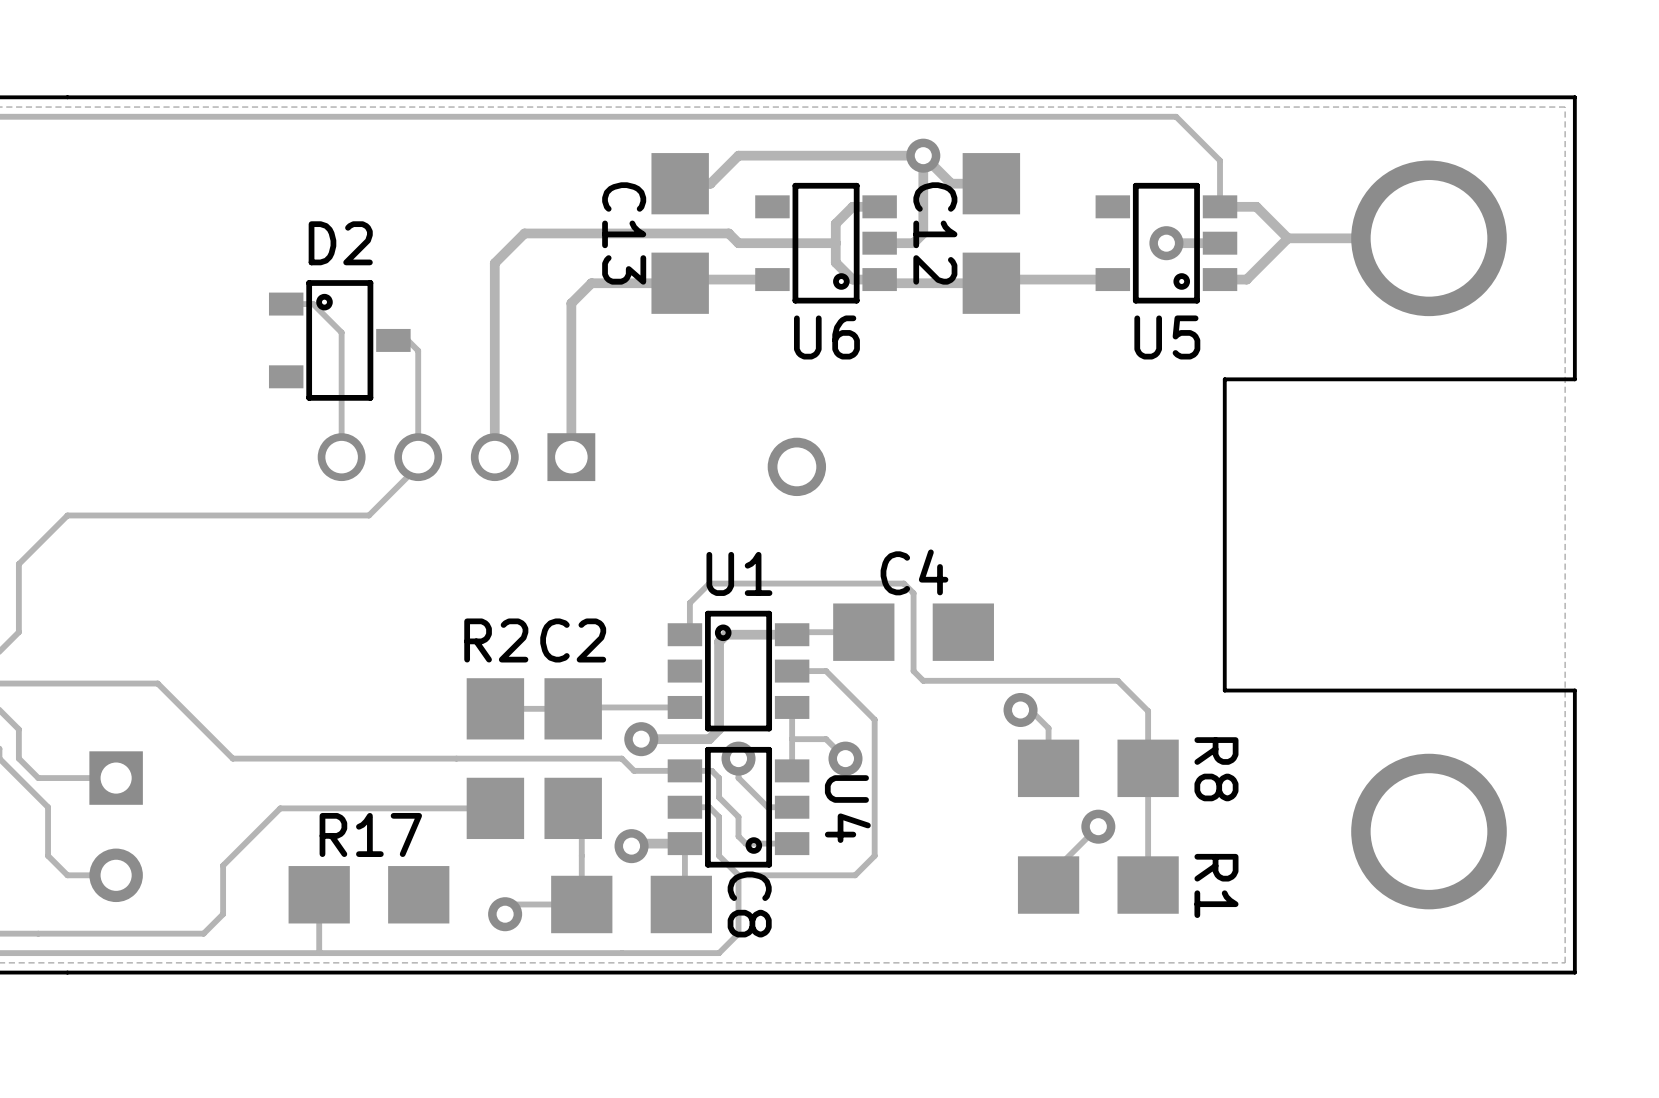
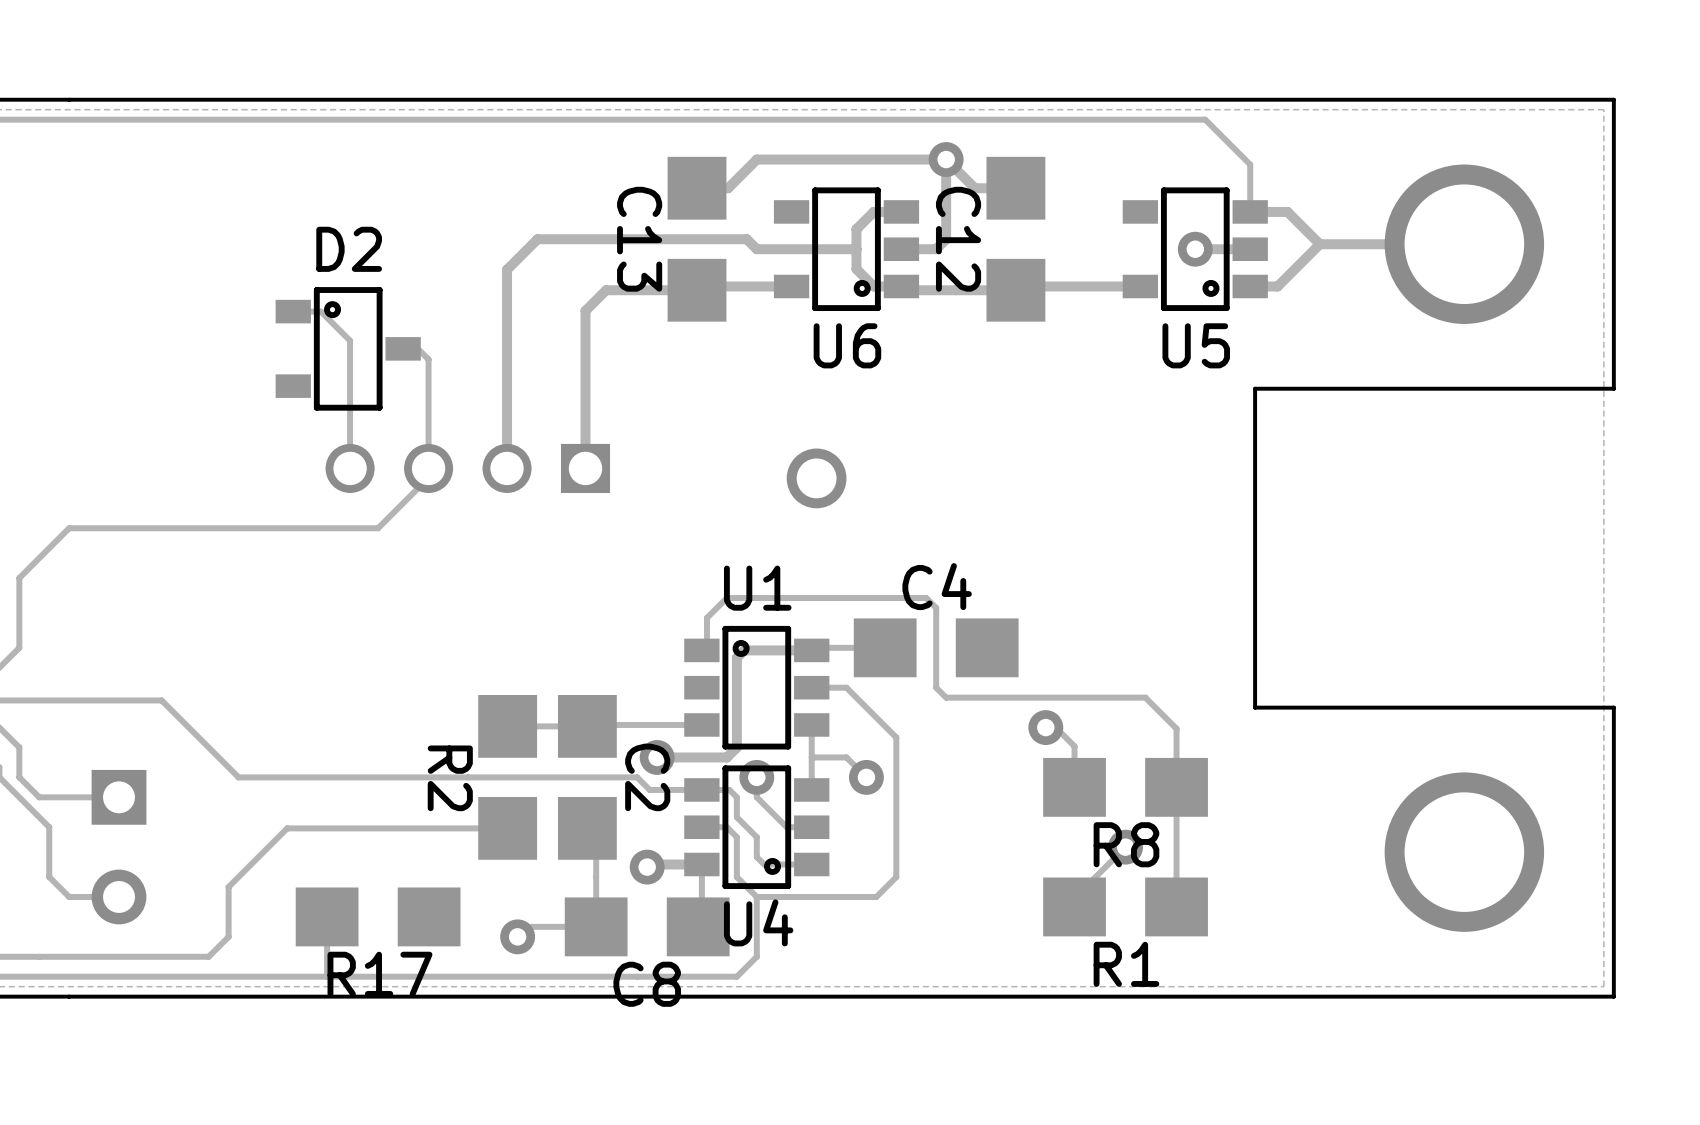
R2 name rotation: 0° (496, 640) -> 90° clockwise (450, 778)
R2 name position: R2 (496, 640) -> R2 (450, 778)
C2 name rotation: 0° (573, 640) -> 90° clockwise (647, 777)
C2 name position: C2 (573, 640) -> C2 (647, 777)
R8 name rotation: 0° (1216, 769) -> 90° counterclockwise (1126, 844)
R8 name position: R8 (1216, 769) -> R8 (1126, 844)
U4 name rotation: 0° (847, 809) -> 90° counterclockwise (758, 922)
U4 name position: U4 (847, 809) -> U4 (758, 922)
R17 name position: R17 (370, 834) -> R17 (379, 974)
R1 name rotation: 0° (1216, 885) -> 90° counterclockwise (1126, 964)
R1 name position: R1 (1216, 885) -> R1 (1126, 964)
C8 name rotation: 0° (749, 904) -> 90° counterclockwise (647, 984)
C8 name position: C8 (749, 904) -> C8 (647, 984)

